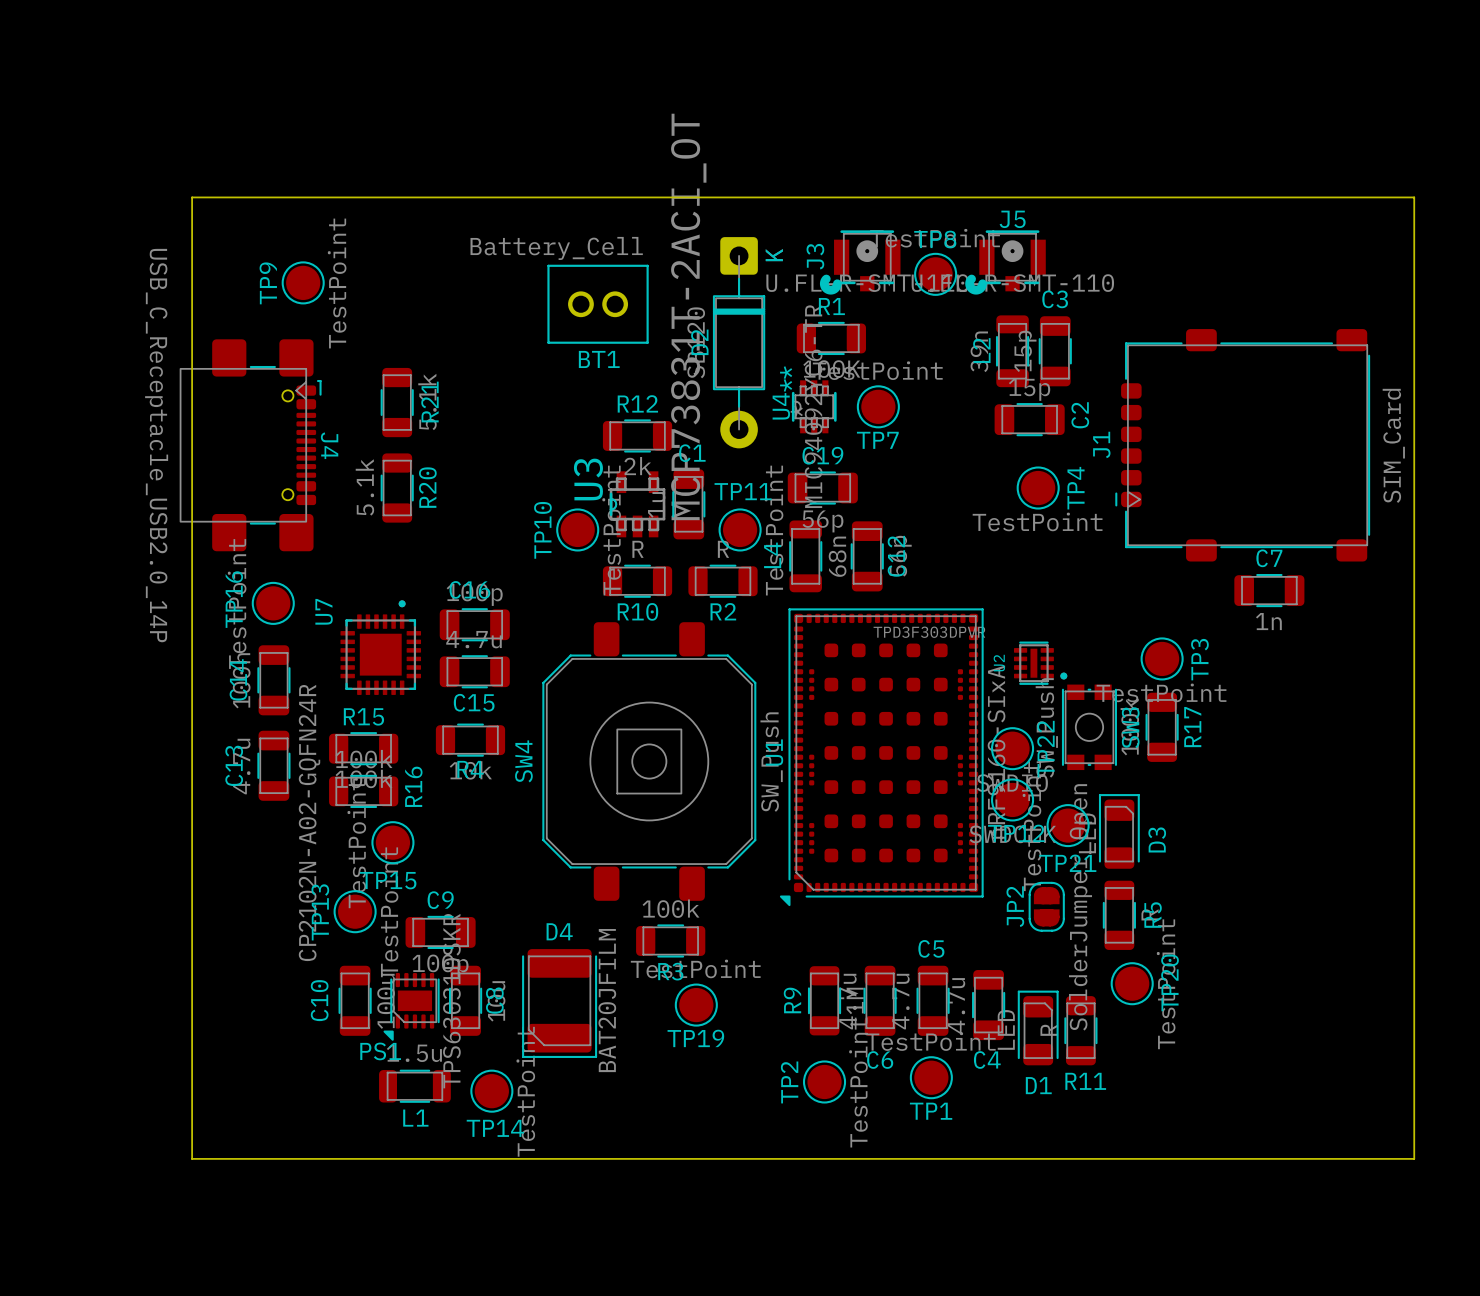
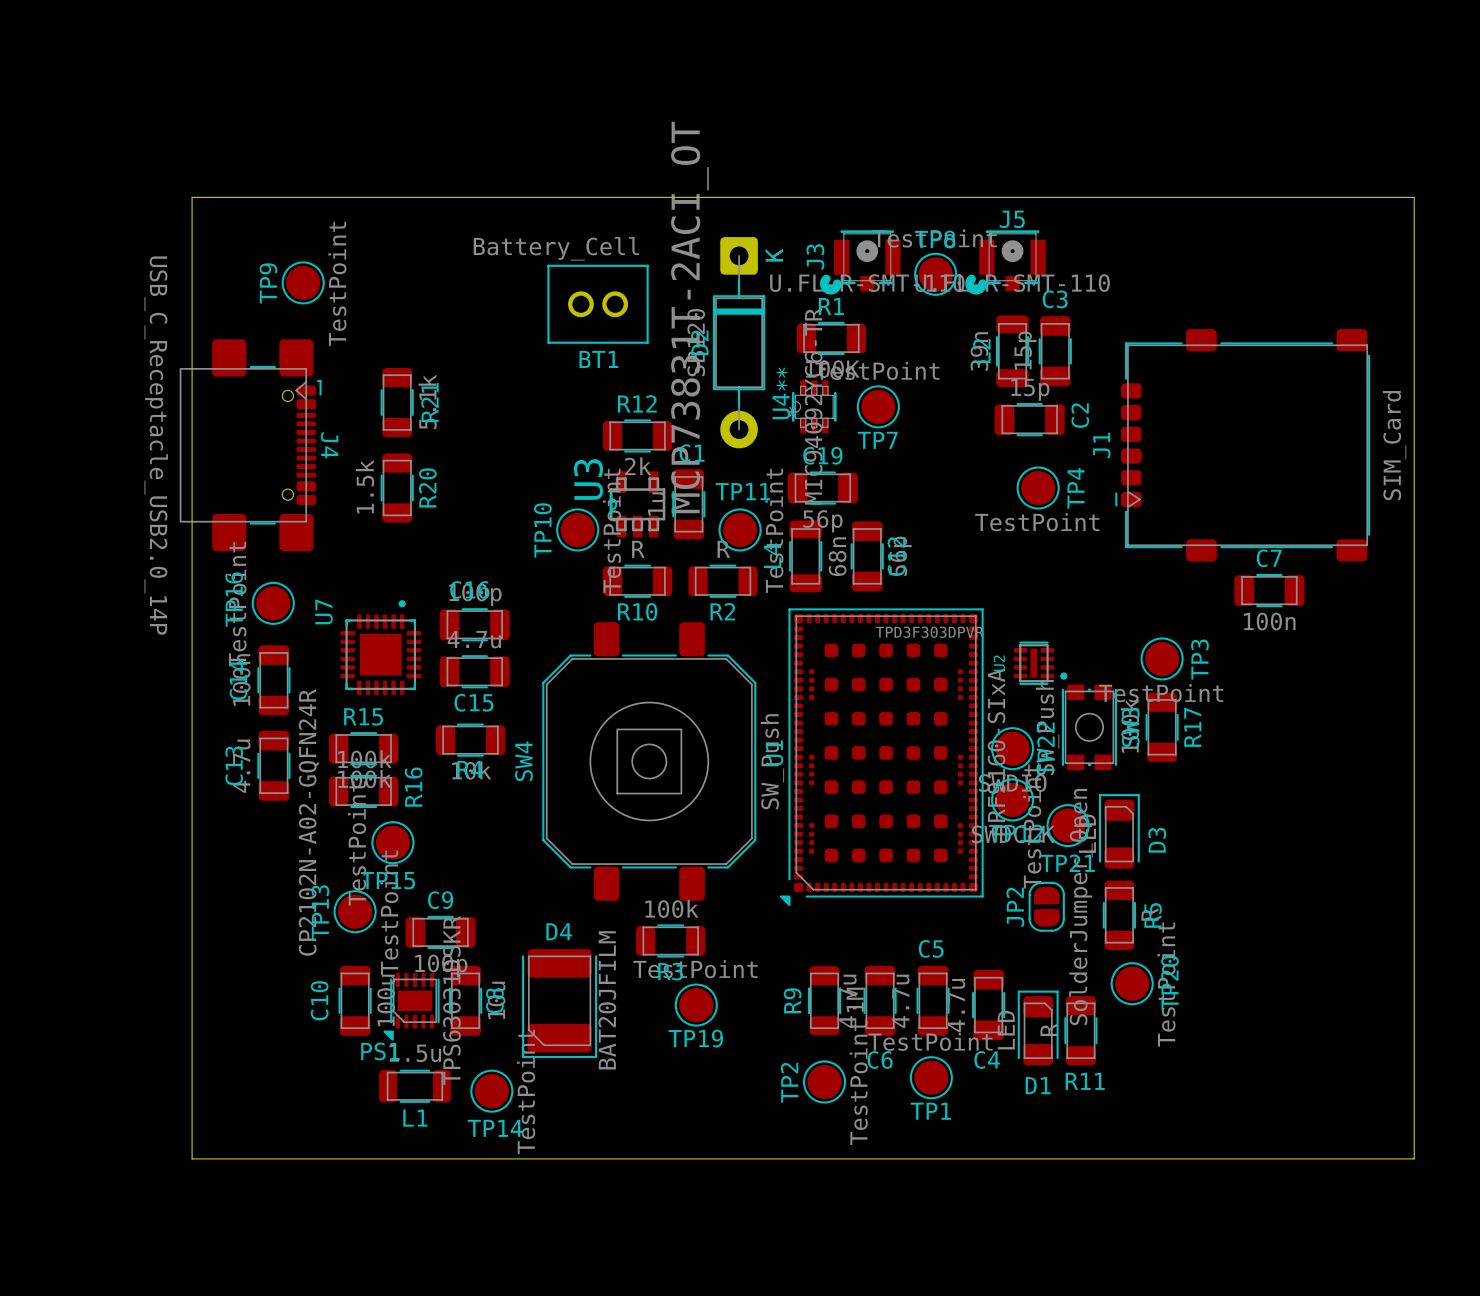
R20 value: 5.1k (364, 487) -> 1.5k (365, 486)
C7 value: 1n (1268, 621) -> 100n (1269, 621)

